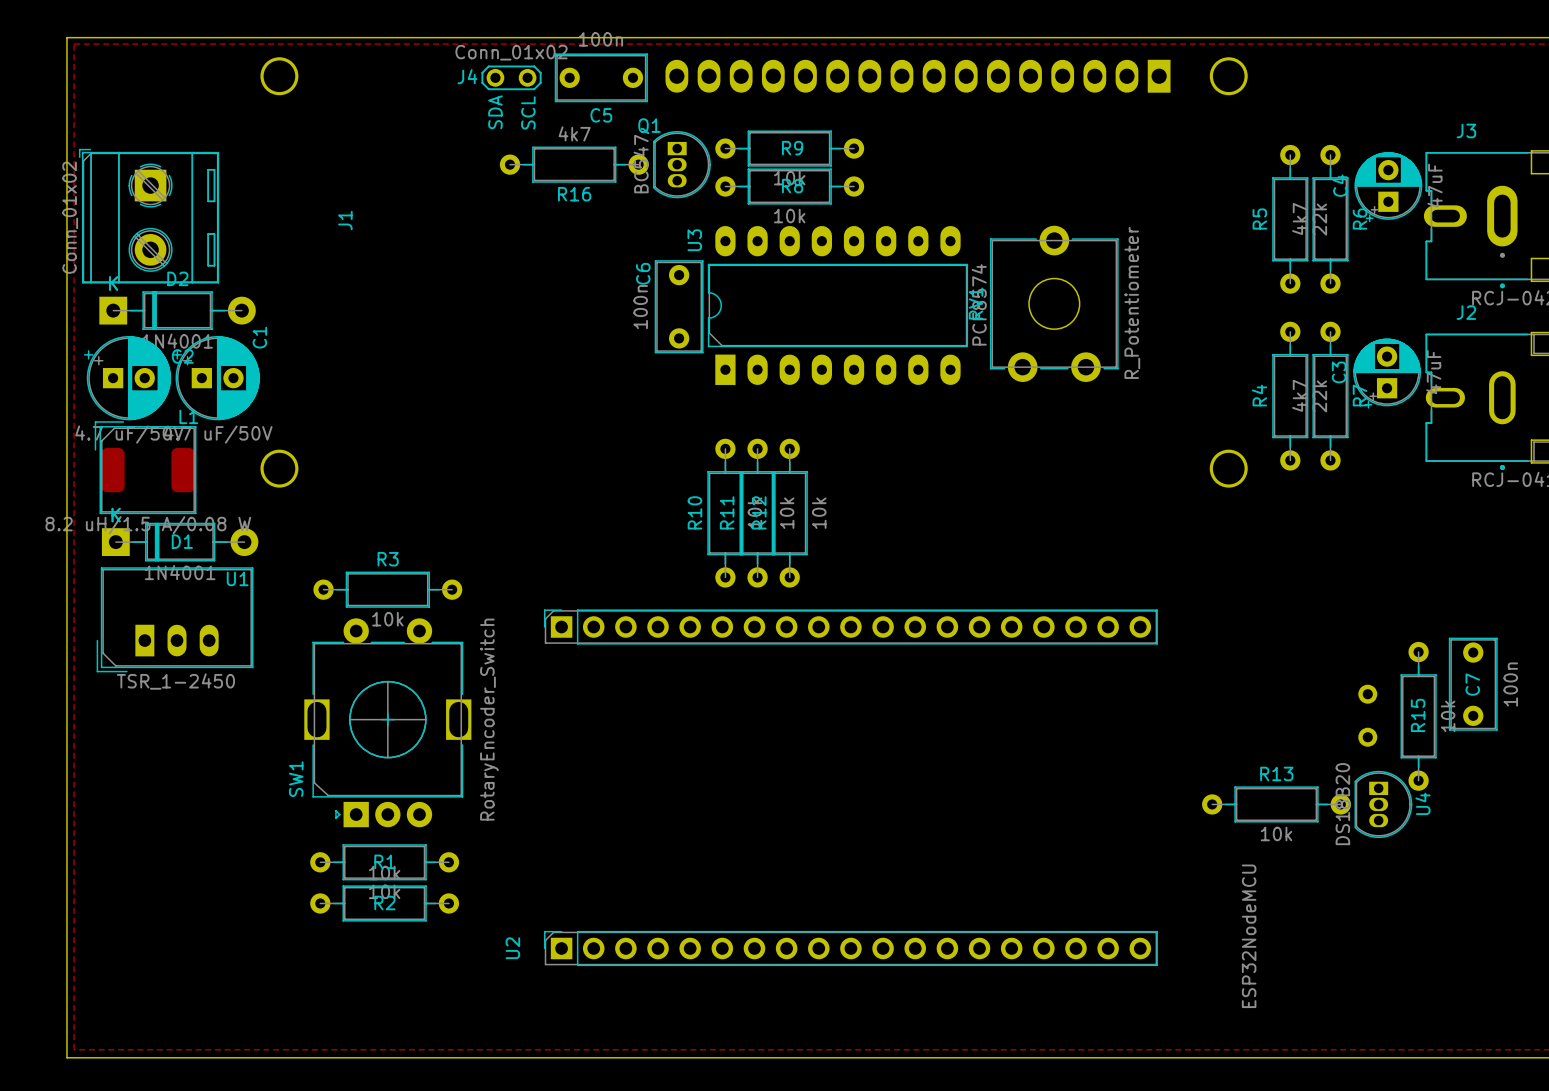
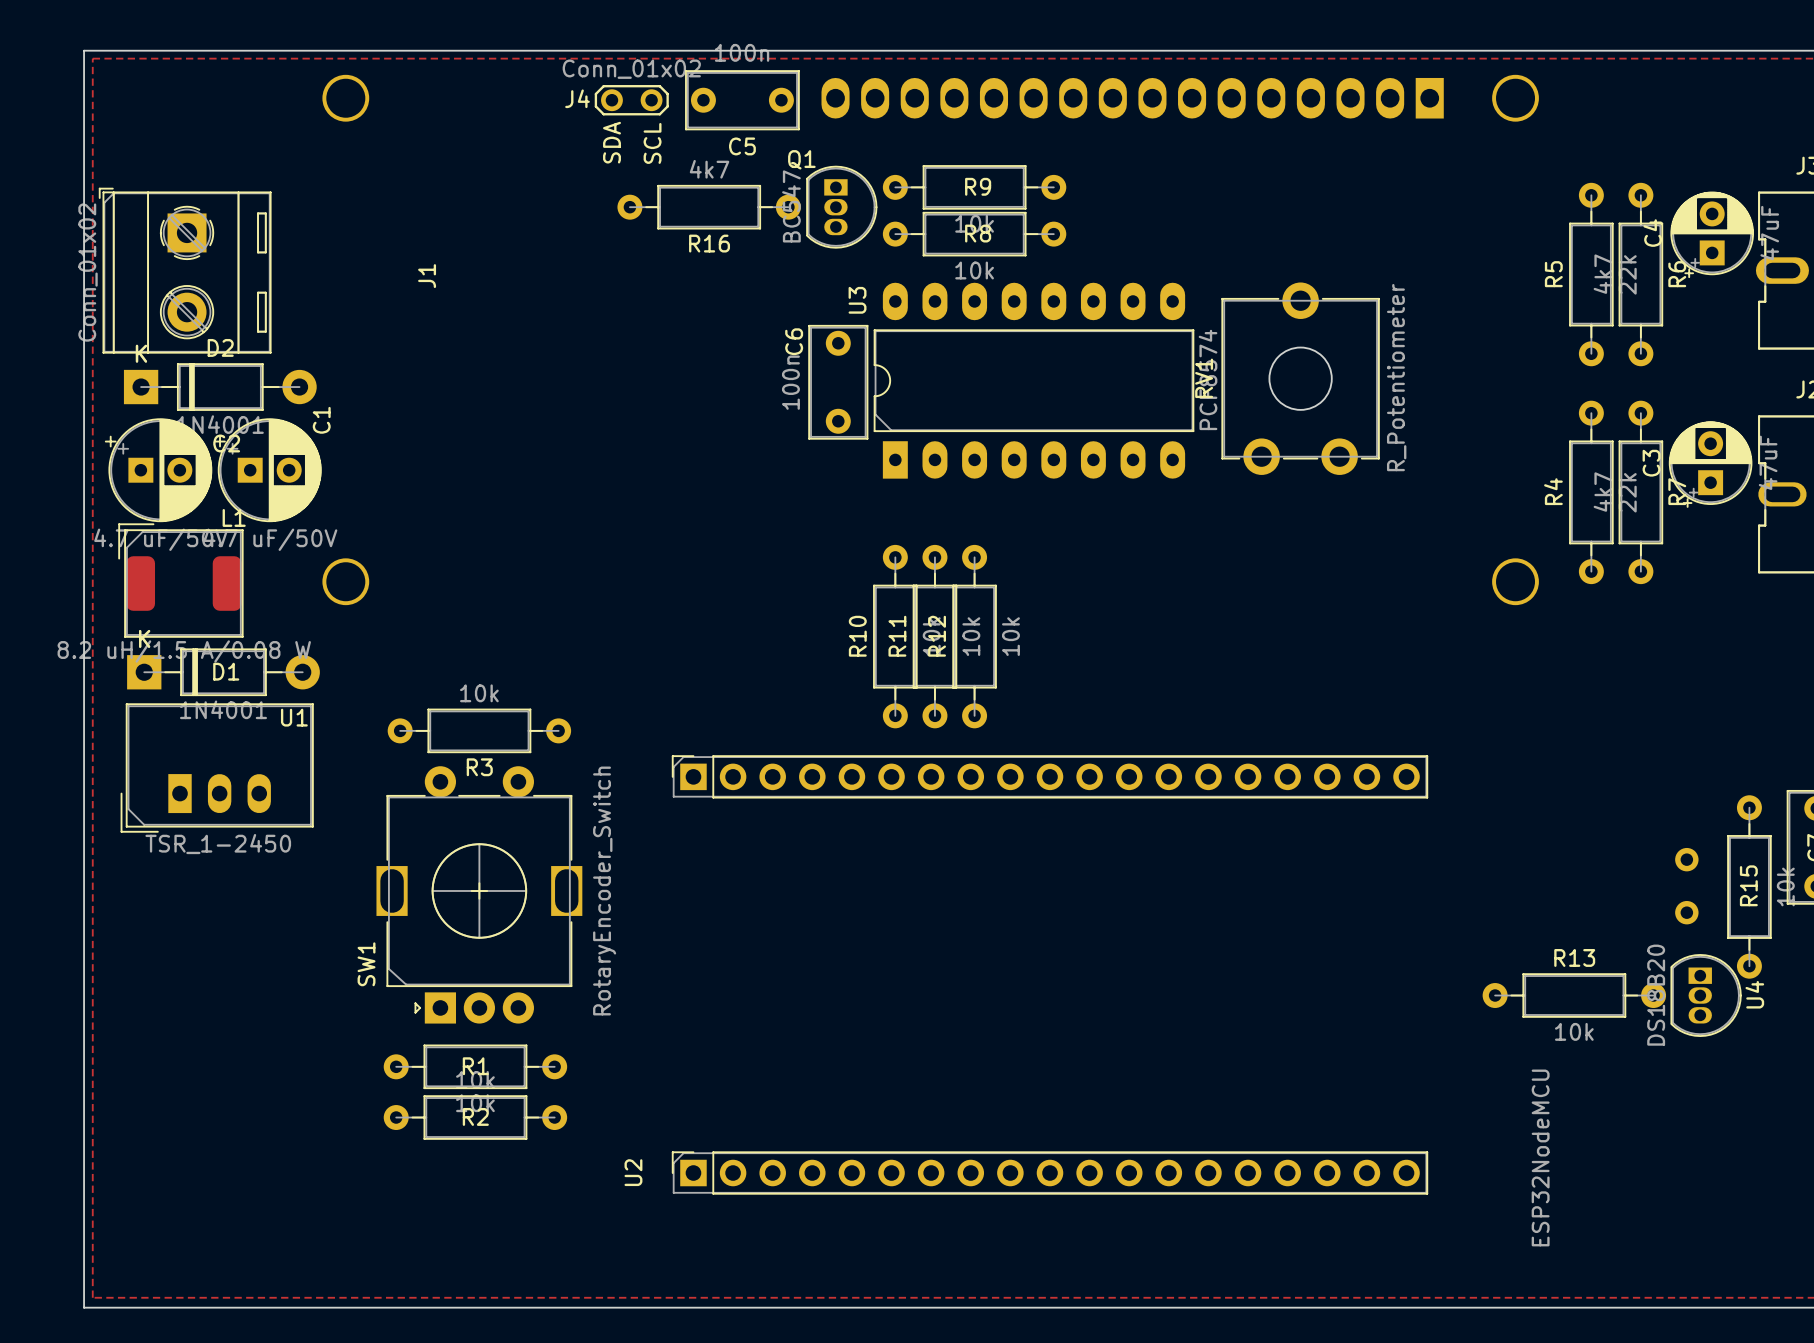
R3 name position: R3 (388, 559) -> R3 (479, 767)
R3 value position: 10k (387, 619) -> 10k (479, 693)

